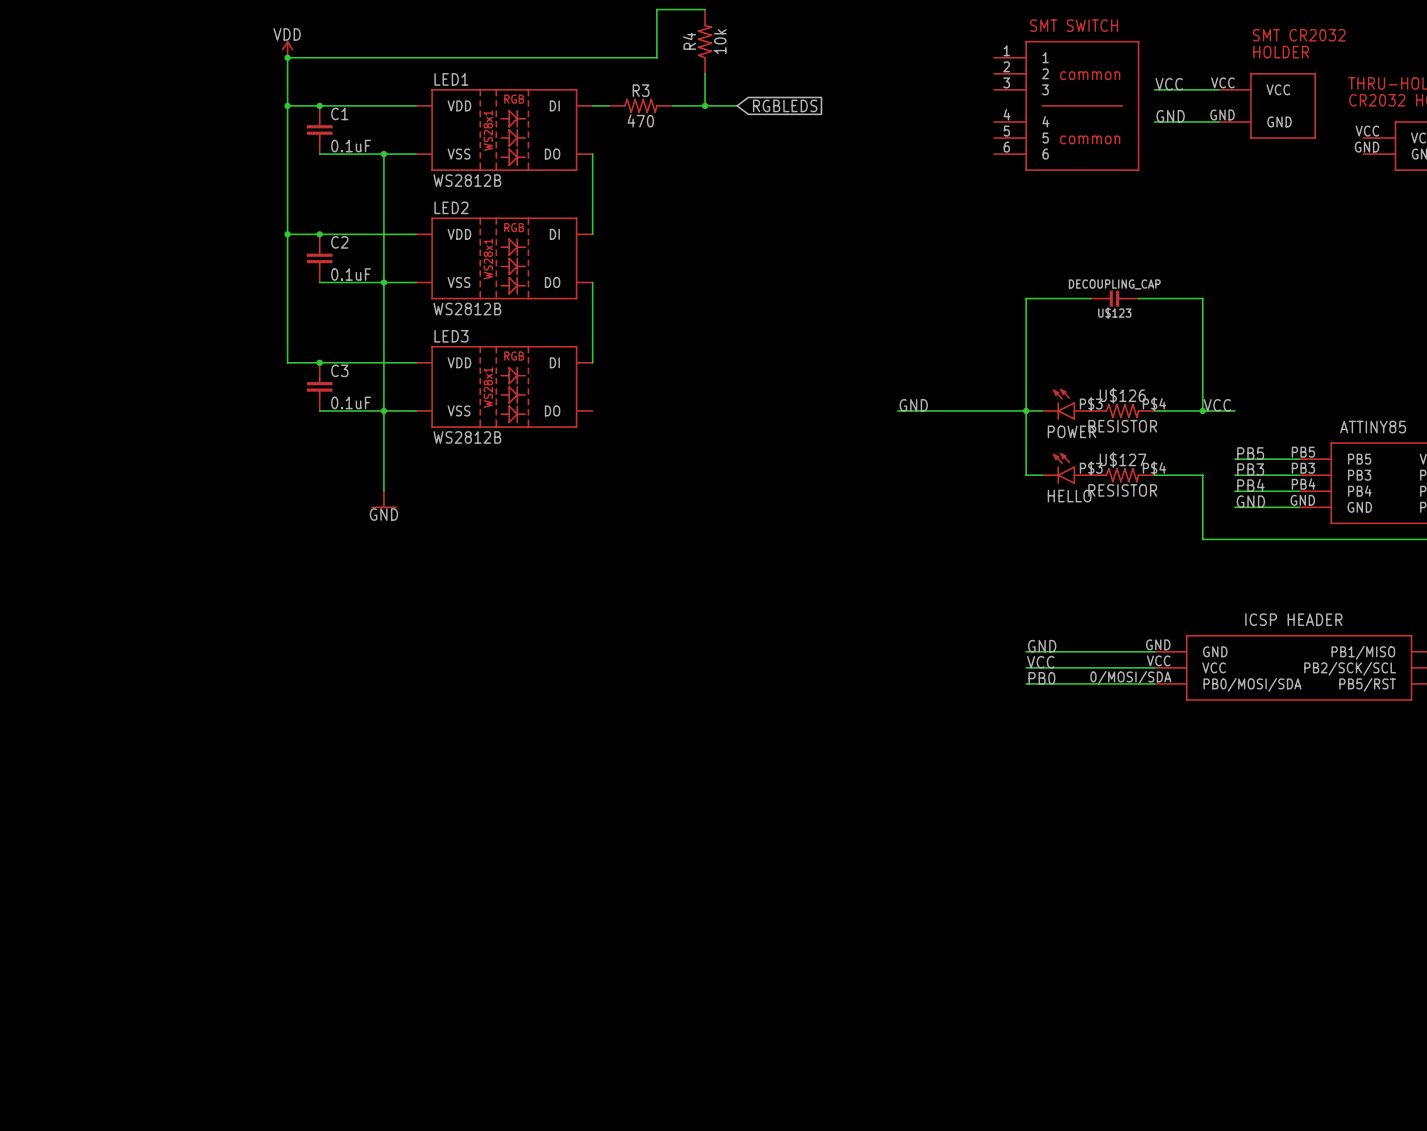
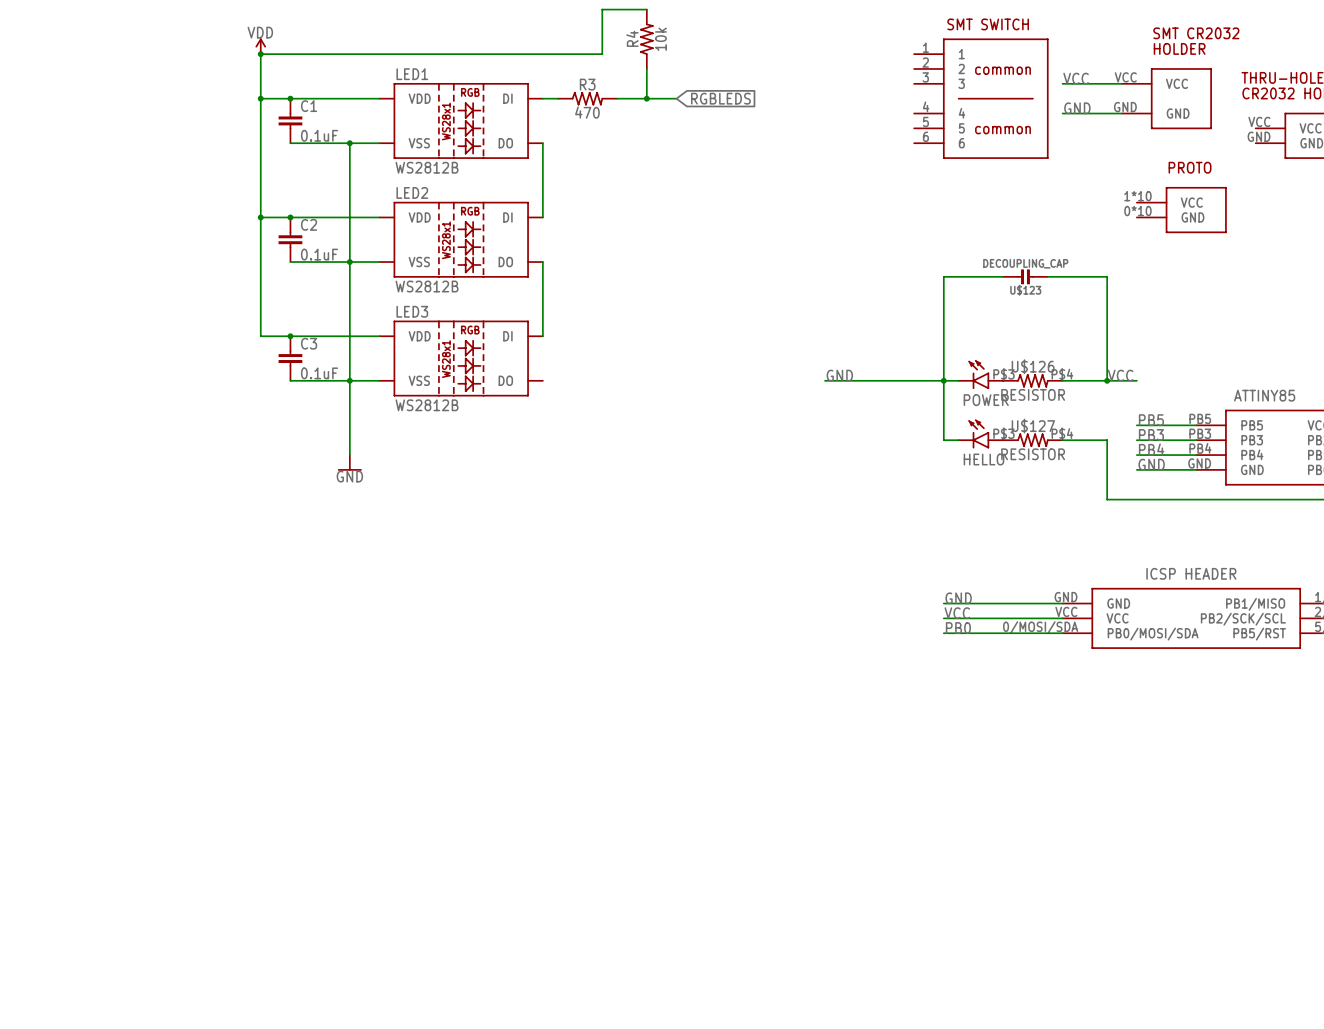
part: none -> (1181, 210)

